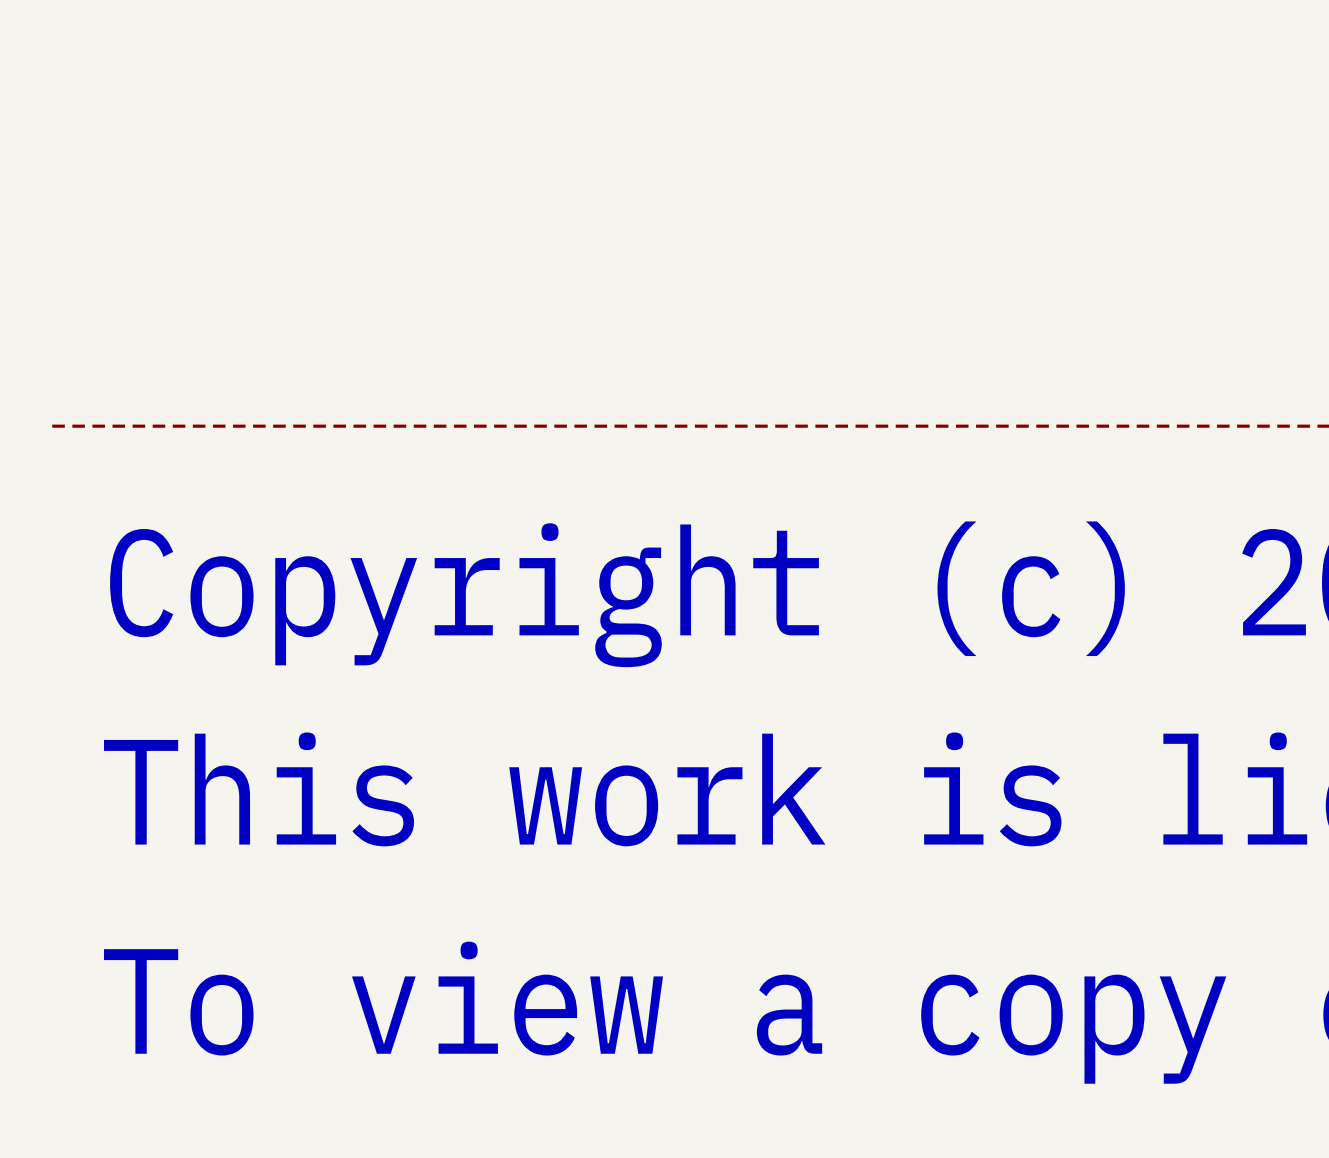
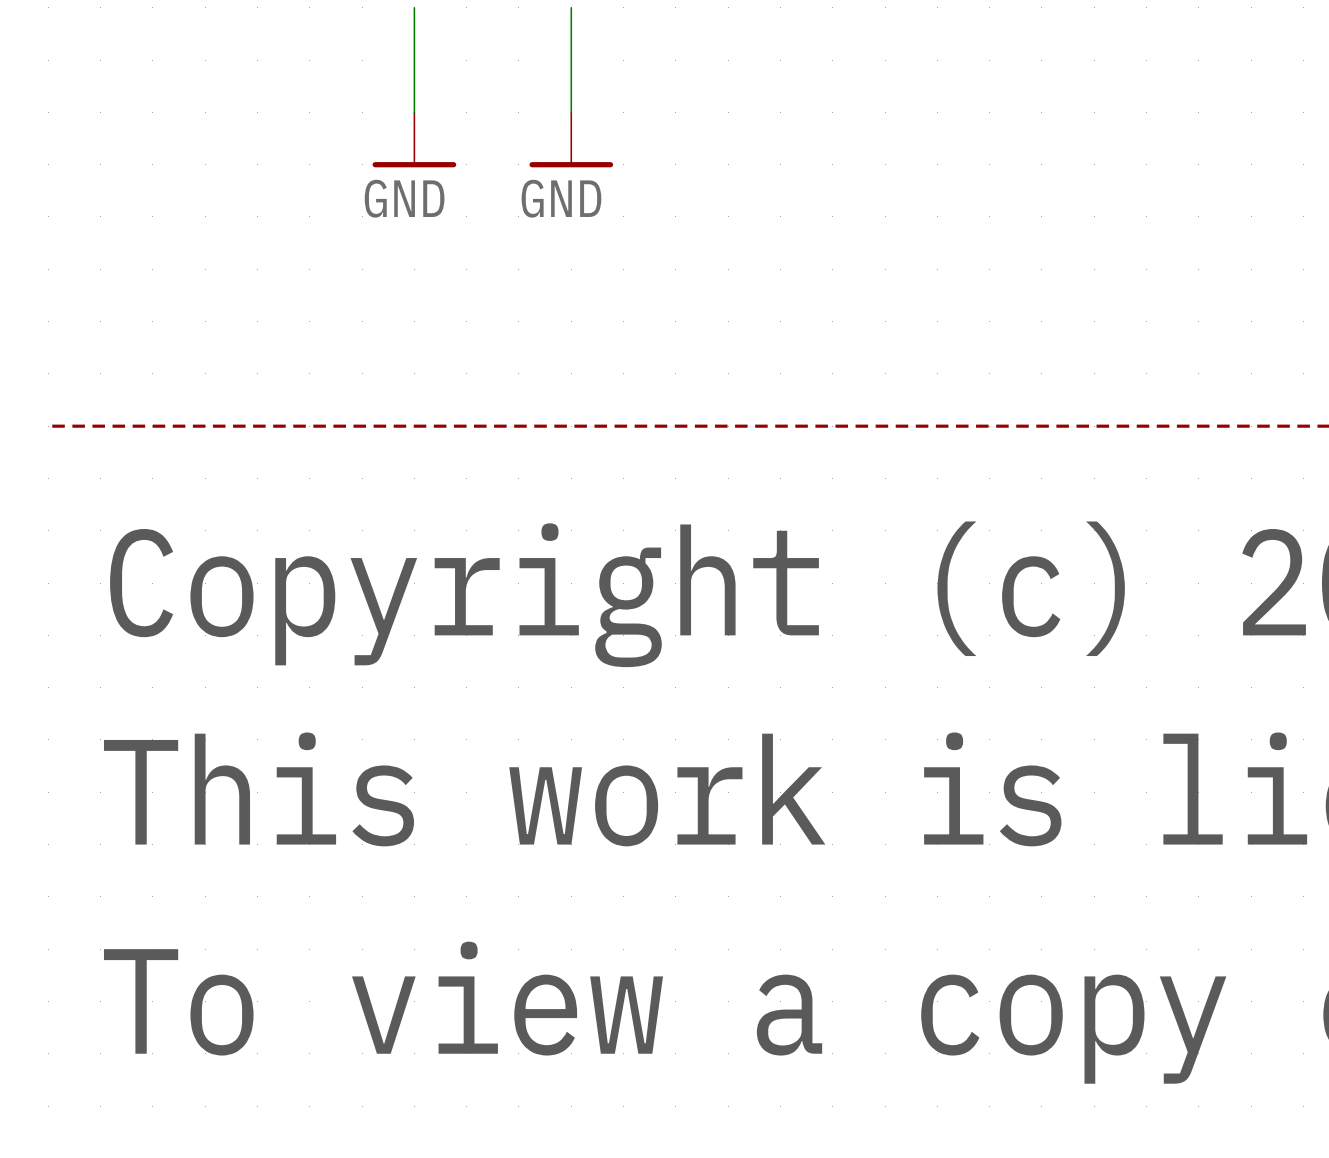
wire: none -> (414, 7) (414, 112)
wire: none -> (571, 7) (571, 112)
power symbol: none -> GND (414, 139)
power symbol: none -> GND (571, 139)

